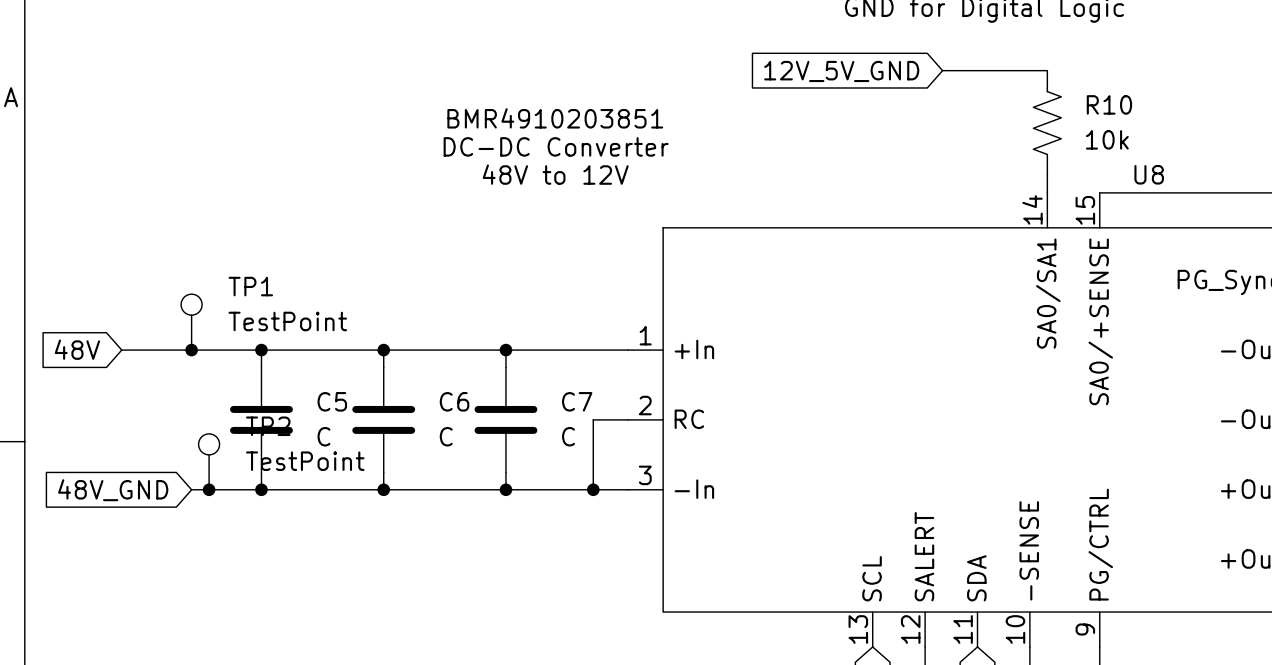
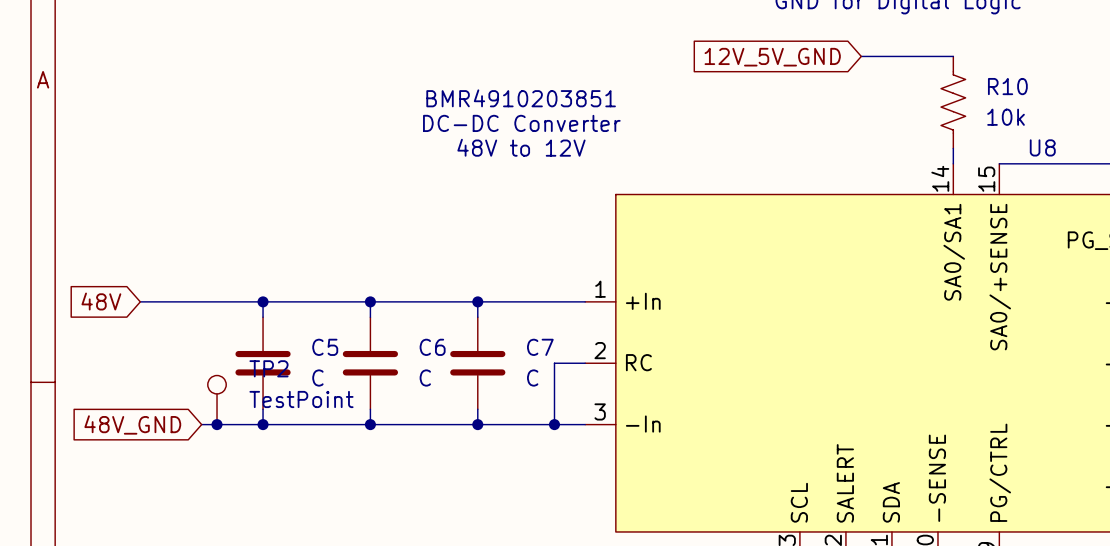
TP1: TestPoint (191, 322) -> none
junction: (191, 350) -> none

